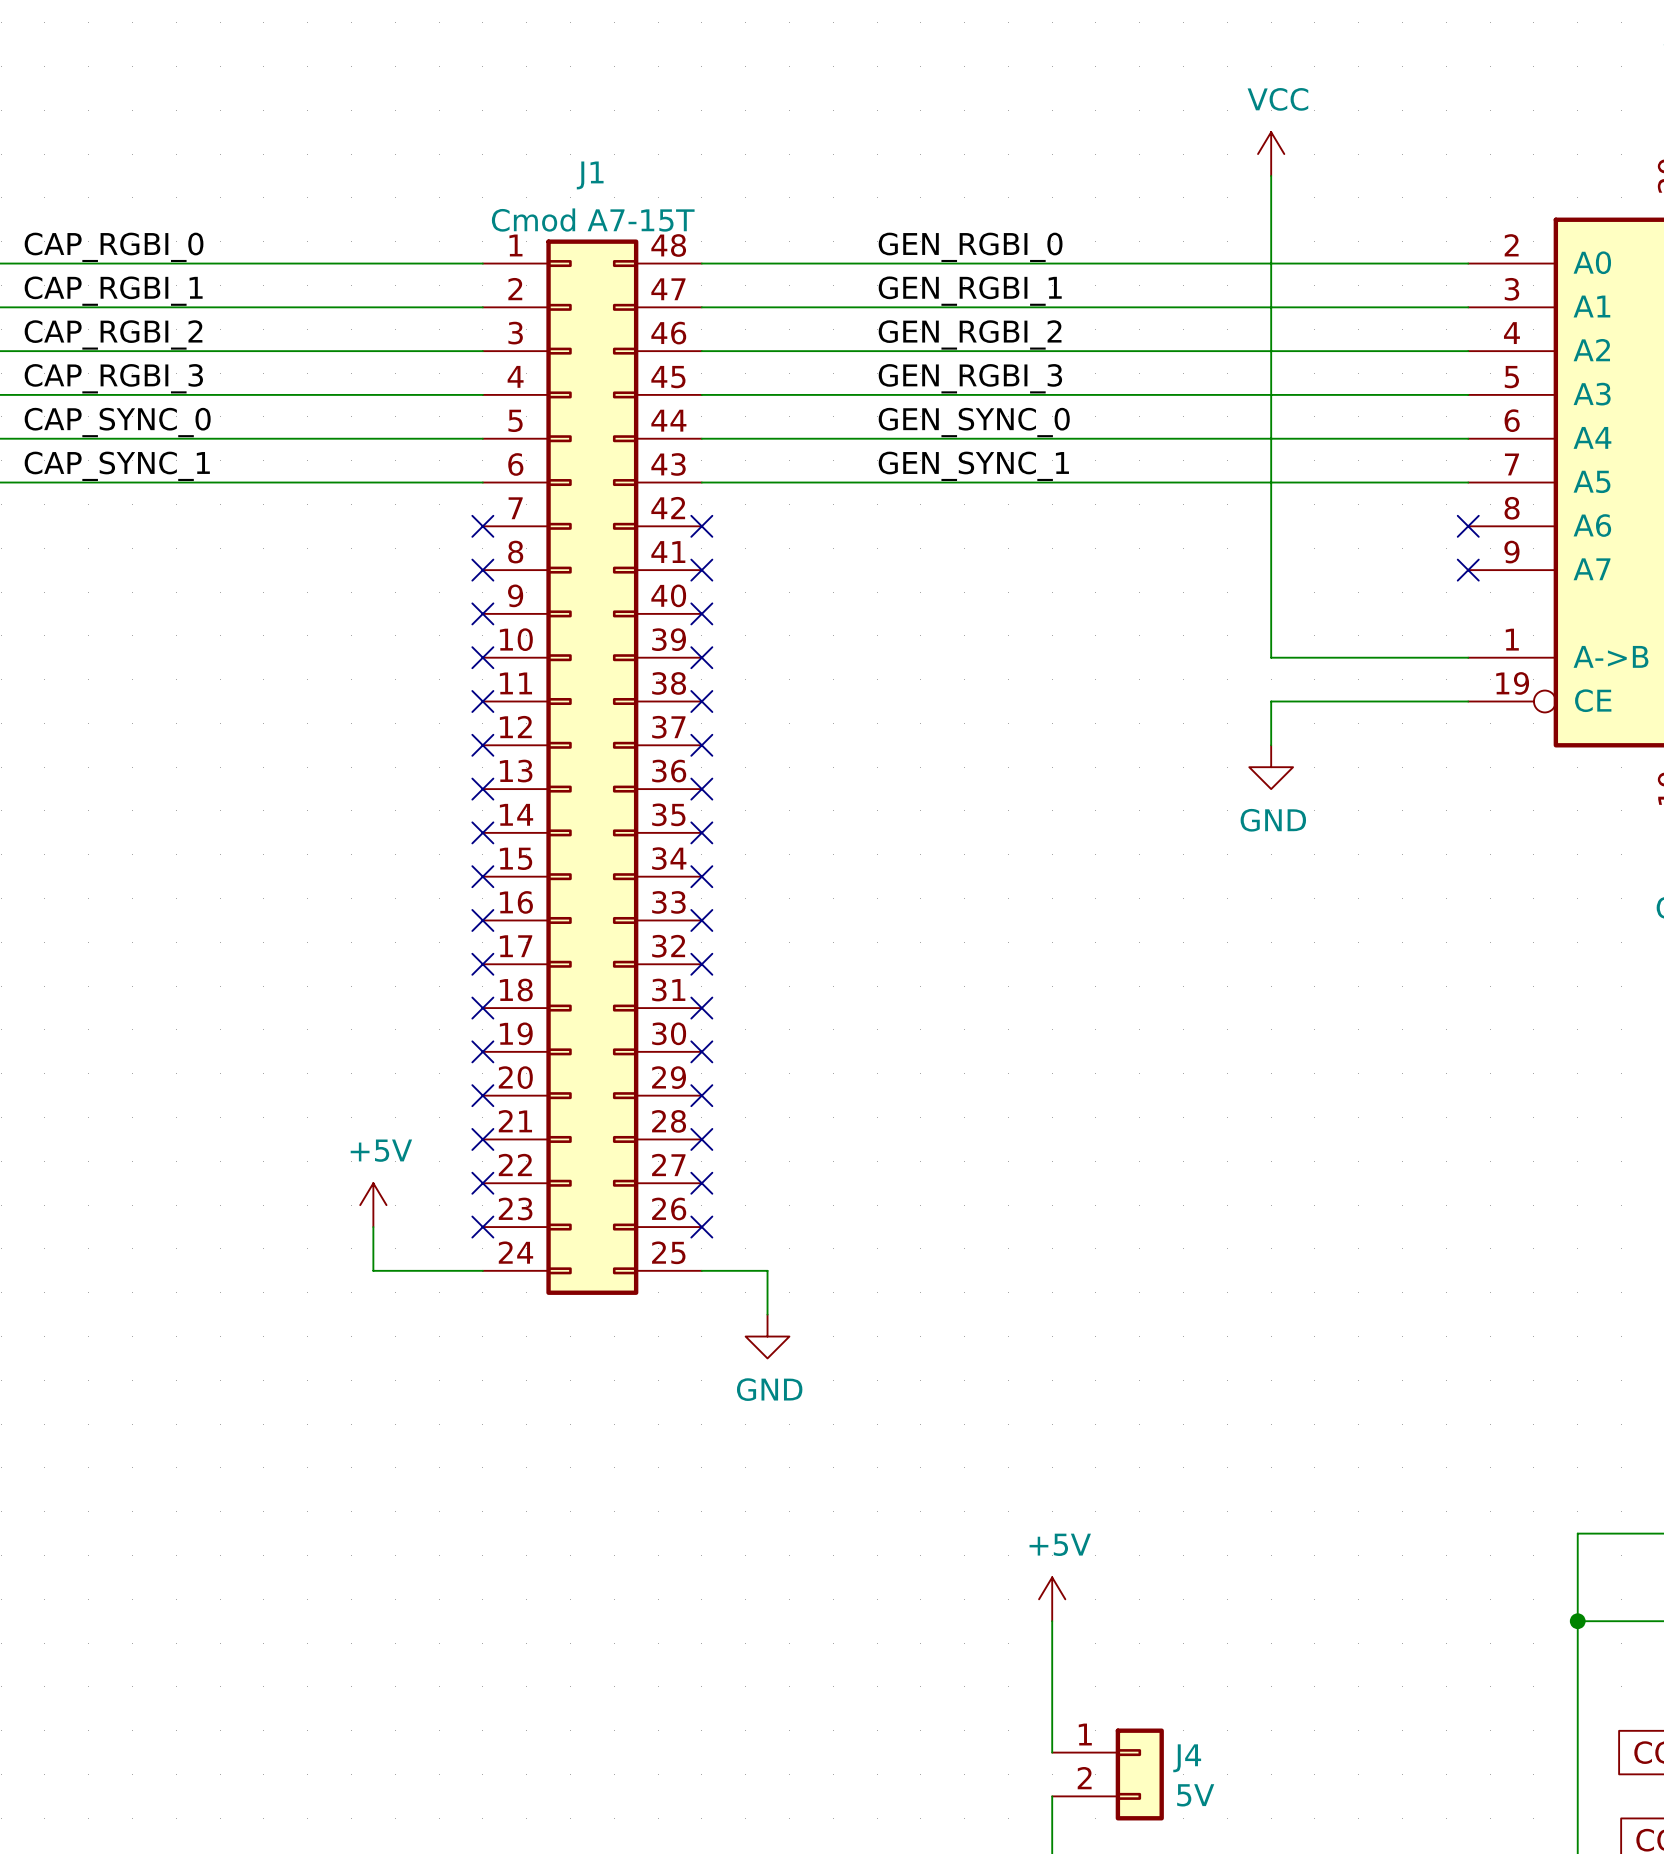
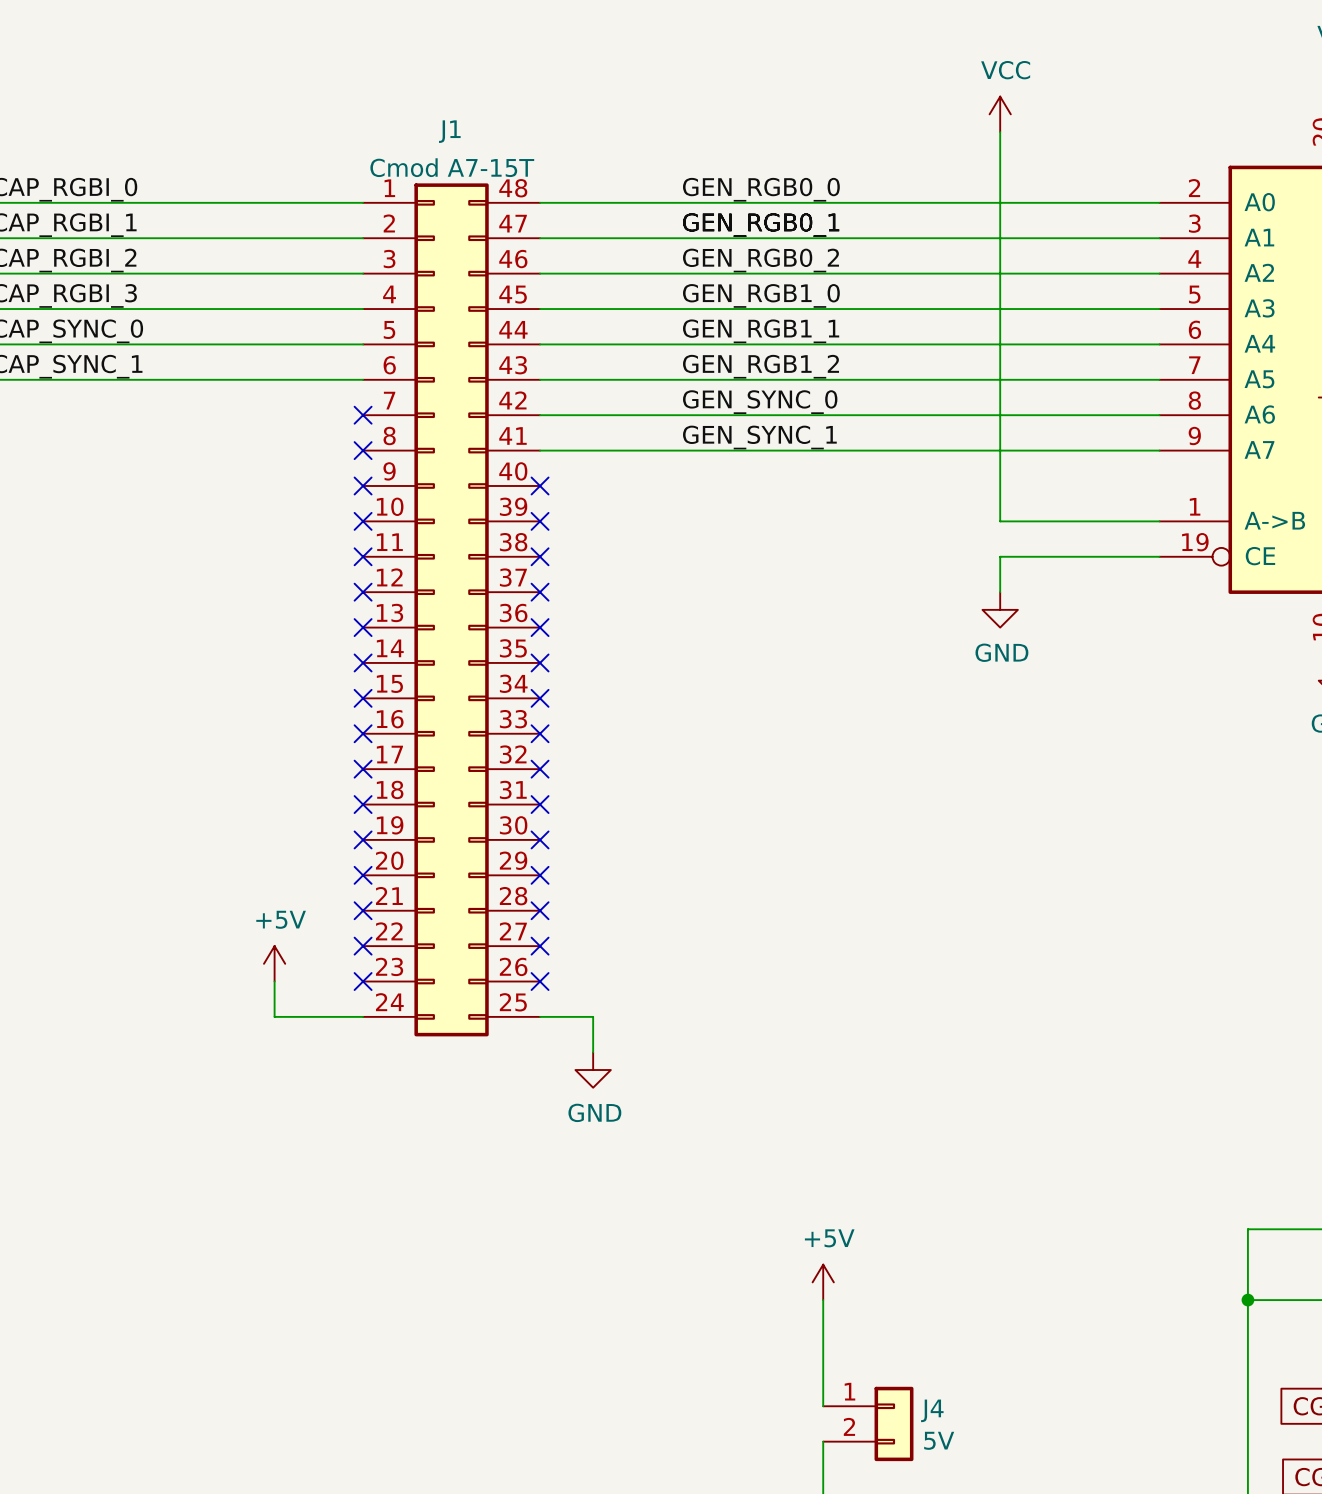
label: GEN_RGBI_0 (970, 247) -> GEN_RGB0_0 (761, 189)
label: GEN_RGBI_1 (970, 291) -> GEN_RGB0_1 (761, 225)
label: GEN_RGBI_2 (970, 334) -> GEN_RGB0_2 (761, 260)
label: GEN_RGBI_3 (970, 378) -> GEN_RGB1_0 (761, 295)
label: GEN_SYNC_0 (974, 422) -> GEN_RGB1_1 (761, 331)
label: GEN_SYNC_1 (973, 466) -> GEN_RGB1_2 (761, 366)
label: none -> GEN_SYNC_0 (760, 402)
wire: none -> (540, 415) (1159, 415)
no-connect mark: (701, 526) -> none
no-connect mark: (1468, 526) -> none
label: none -> GEN_SYNC_1 (759, 437)
wire: none -> (540, 450) (1159, 450)
no-connect mark: (701, 570) -> none
no-connect mark: (1468, 570) -> none

